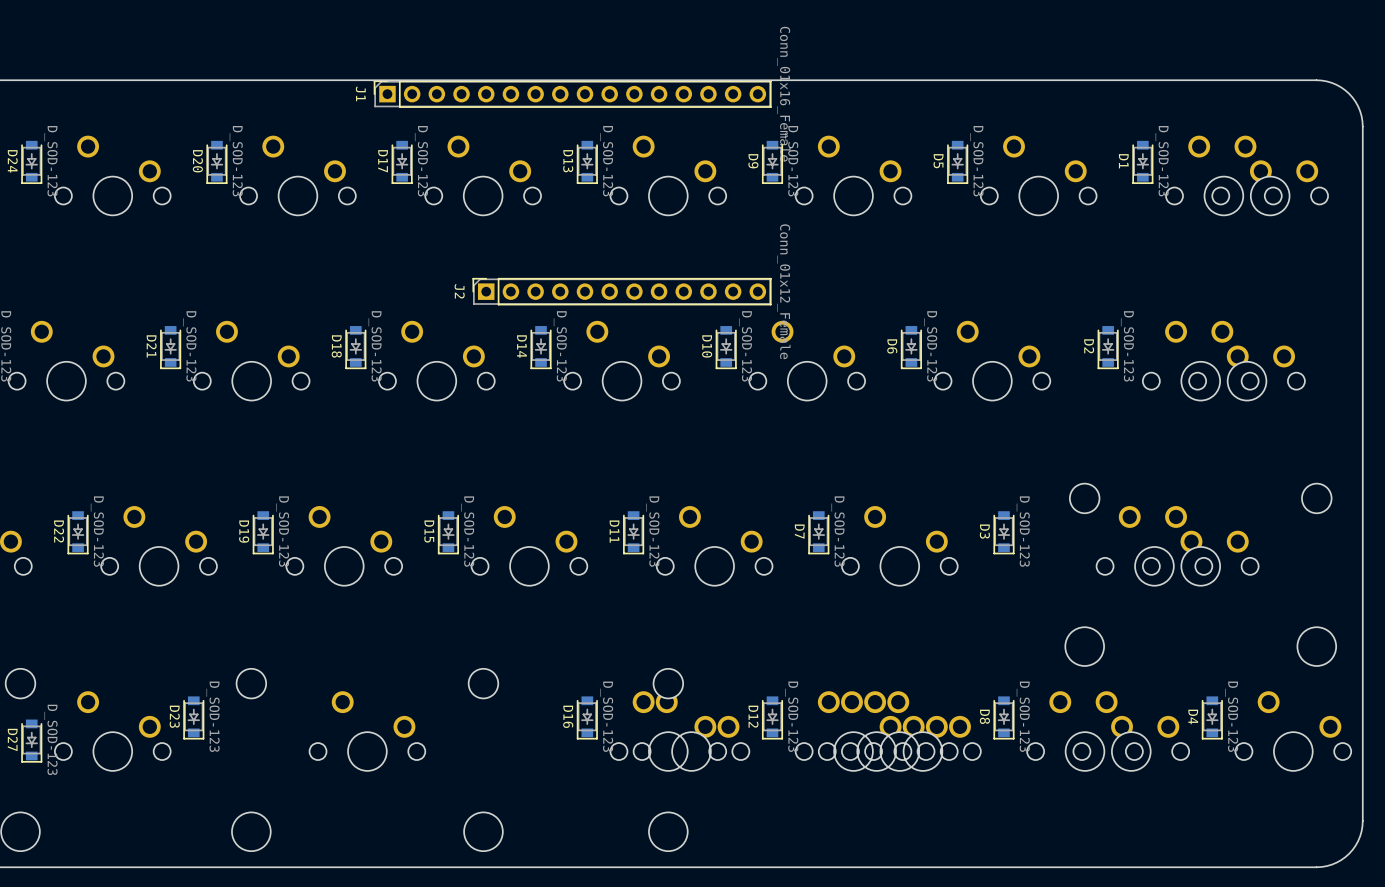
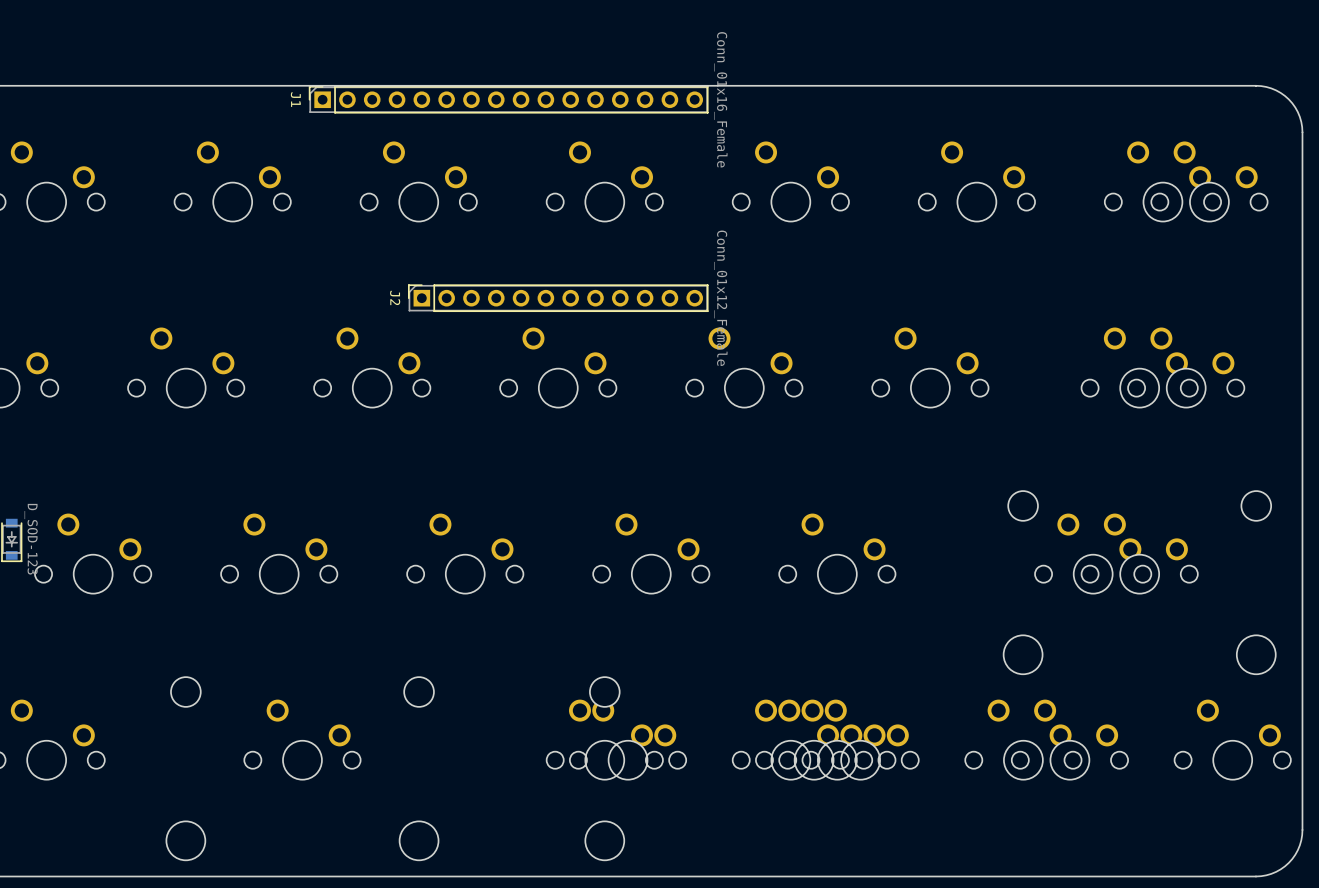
D20: D_SOD-123 (216, 162) -> none
D17: D_SOD-123 (402, 162) -> none
D13: D_SOD-123 (587, 162) -> none
D9: D_SOD-123 (772, 162) -> none
D5: D_SOD-123 (957, 162) -> none
D1: D_SOD-123 (1142, 162) -> none
D21: D_SOD-123 (170, 347) -> none
D18: D_SOD-123 (355, 347) -> none
D14: D_SOD-123 (541, 347) -> none
D10: D_SOD-123 (726, 347) -> none
D6: D_SOD-123 (911, 347) -> none
D2: D_SOD-123 (1108, 347) -> none
D19: D_SOD-123 (263, 532) -> none
D15: D_SOD-123 (448, 532) -> none
D11: D_SOD-123 (633, 532) -> none
D7: D_SOD-123 (818, 532) -> none
D3: D_SOD-123 (1003, 532) -> none
D23: D_SOD-123 (193, 717) -> none
D16: D_SOD-123 (587, 717) -> none
D12: D_SOD-123 (772, 717) -> none
D8: D_SOD-123 (1003, 717) -> none
D4: D_SOD-123 (1212, 717) -> none

